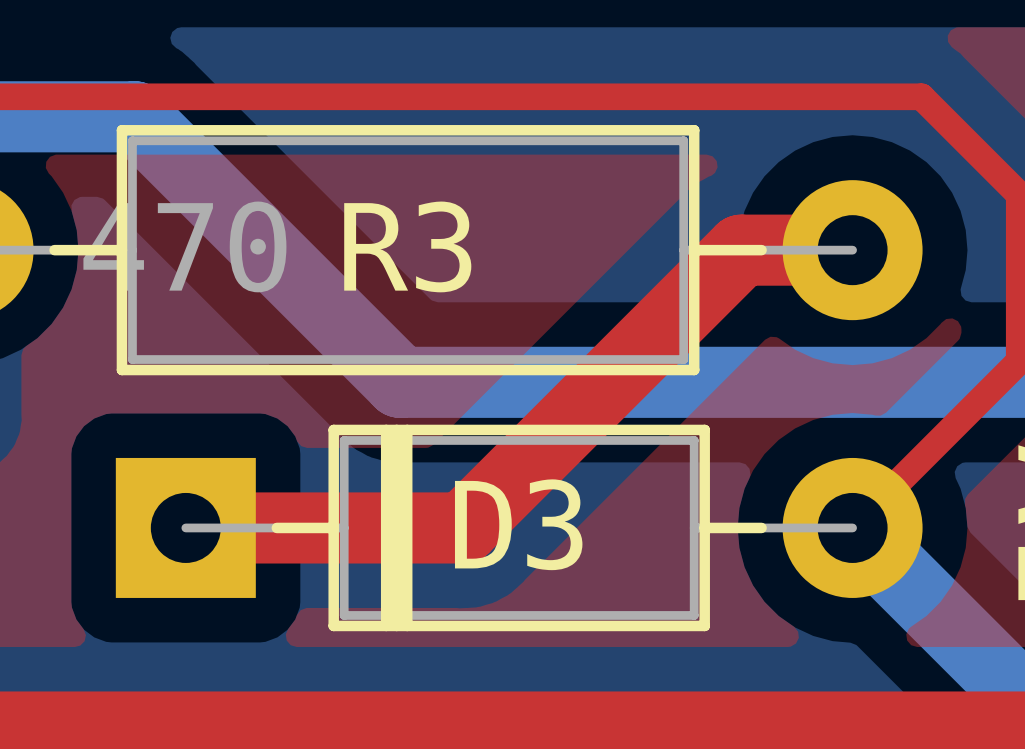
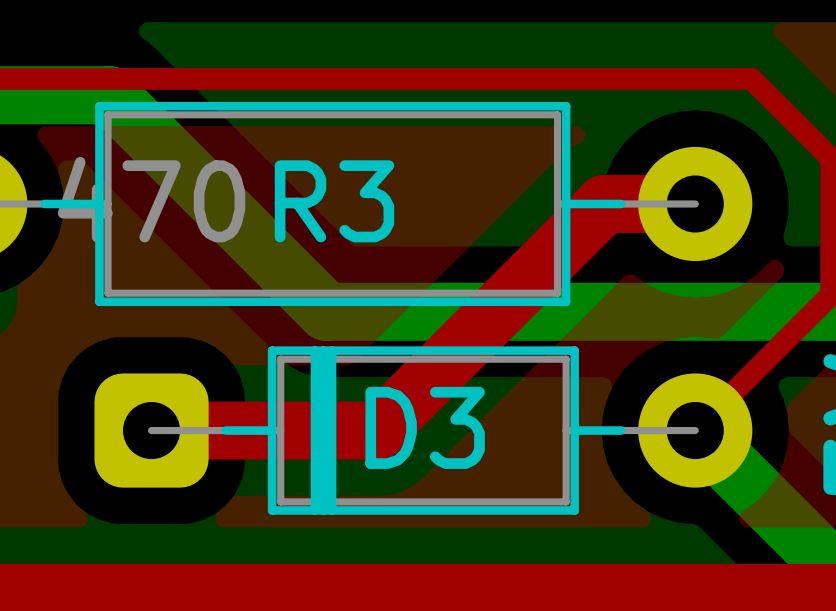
D3 footprint: [115, 424, 923, 632] -> [94, 346, 753, 515]

